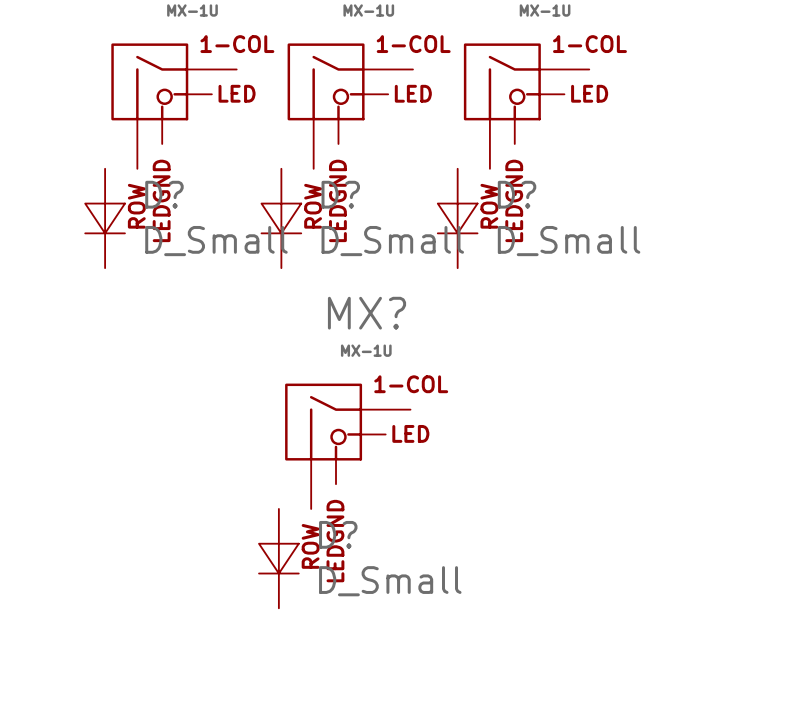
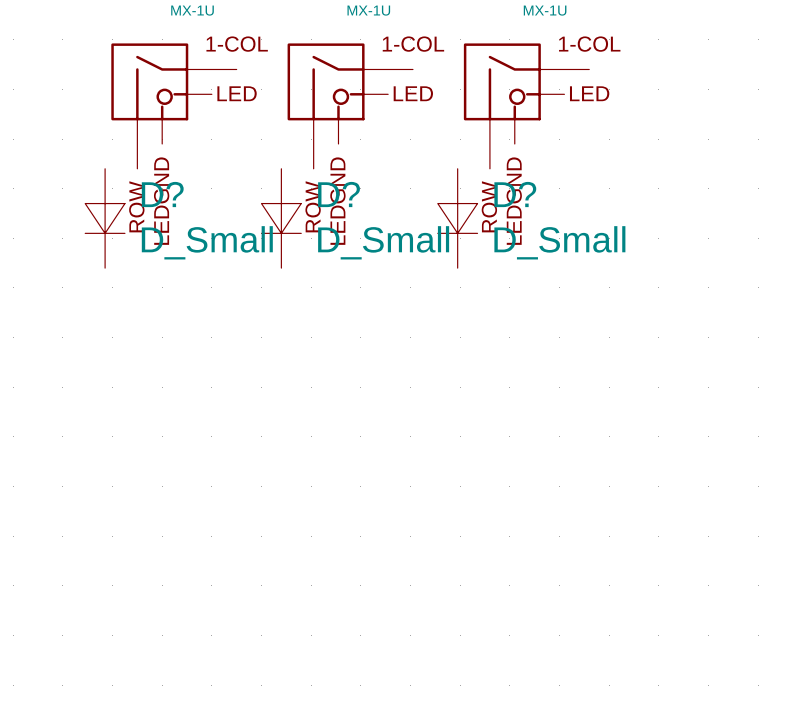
MX?: MX-1U (347, 446) -> none
D?: D_Small (278, 558) -> none

